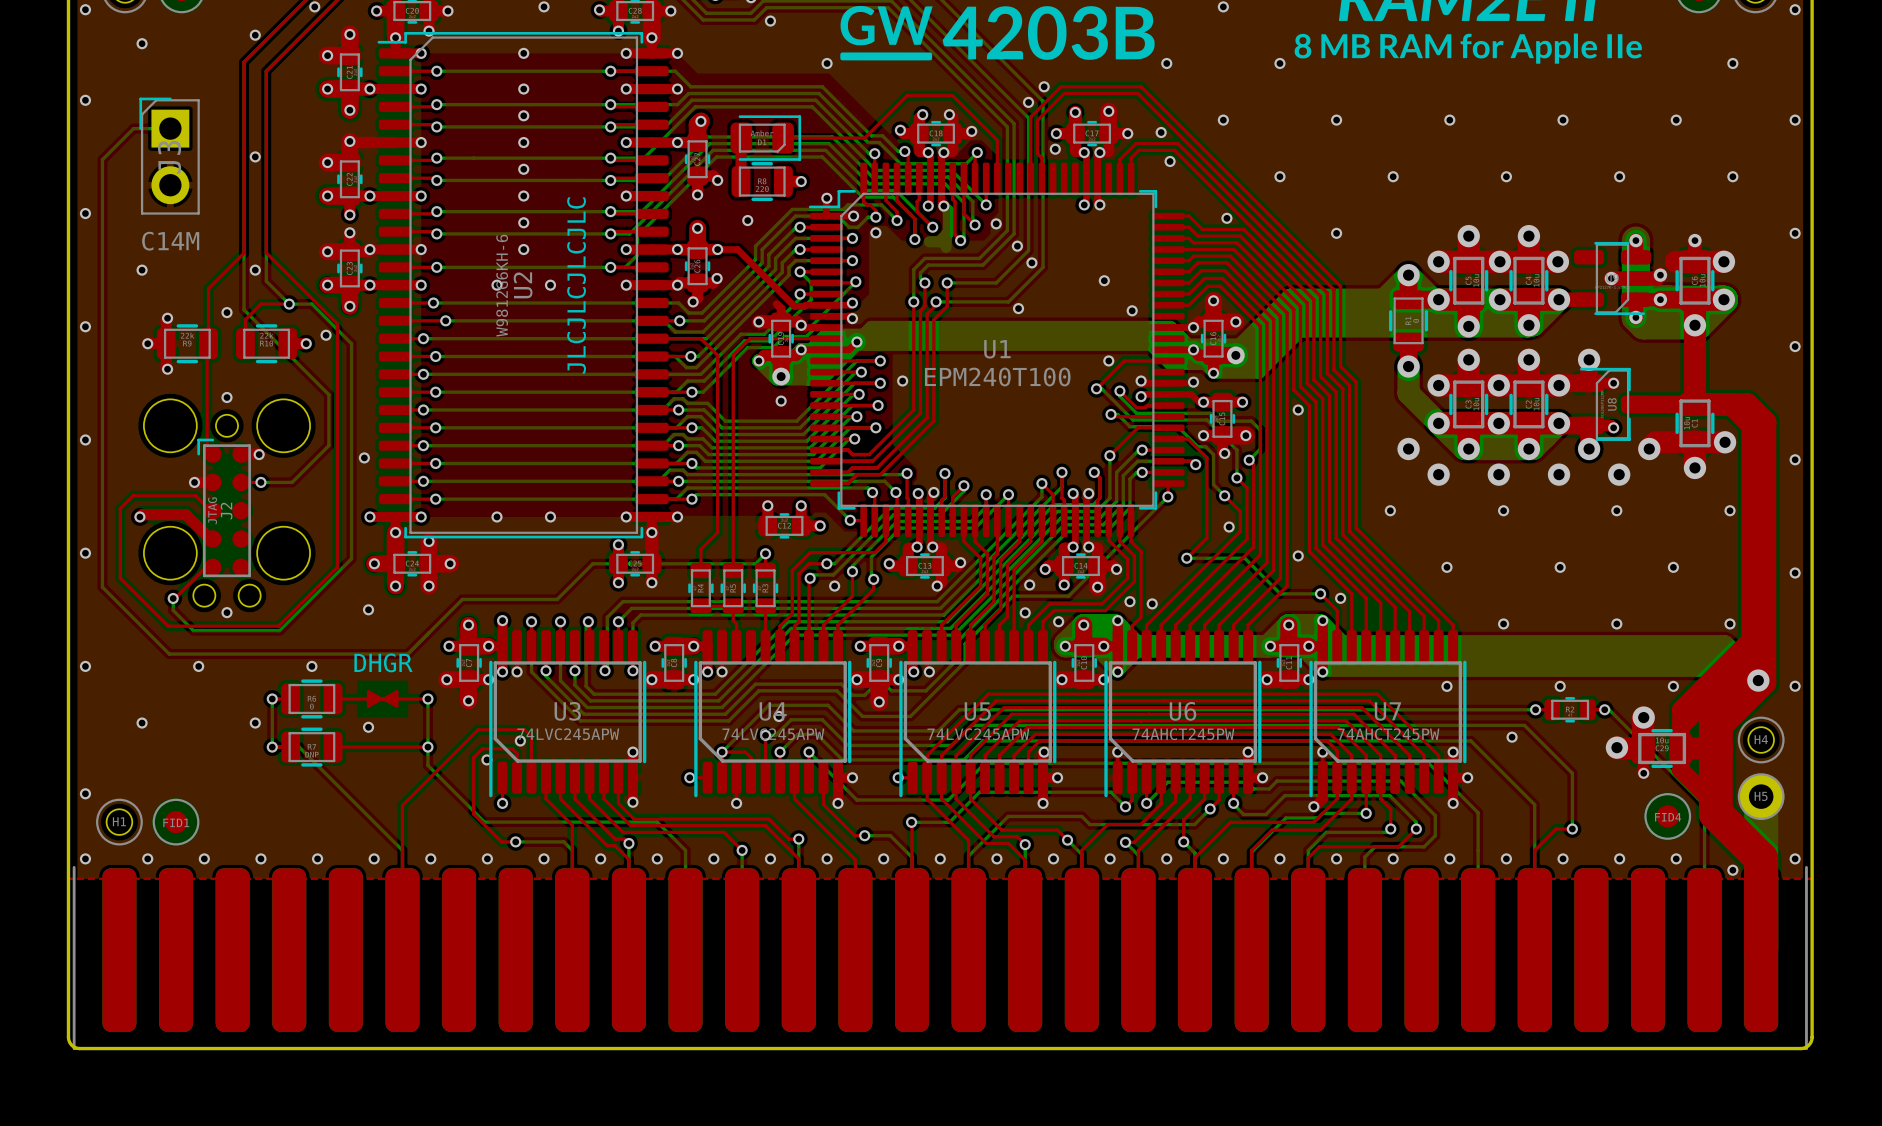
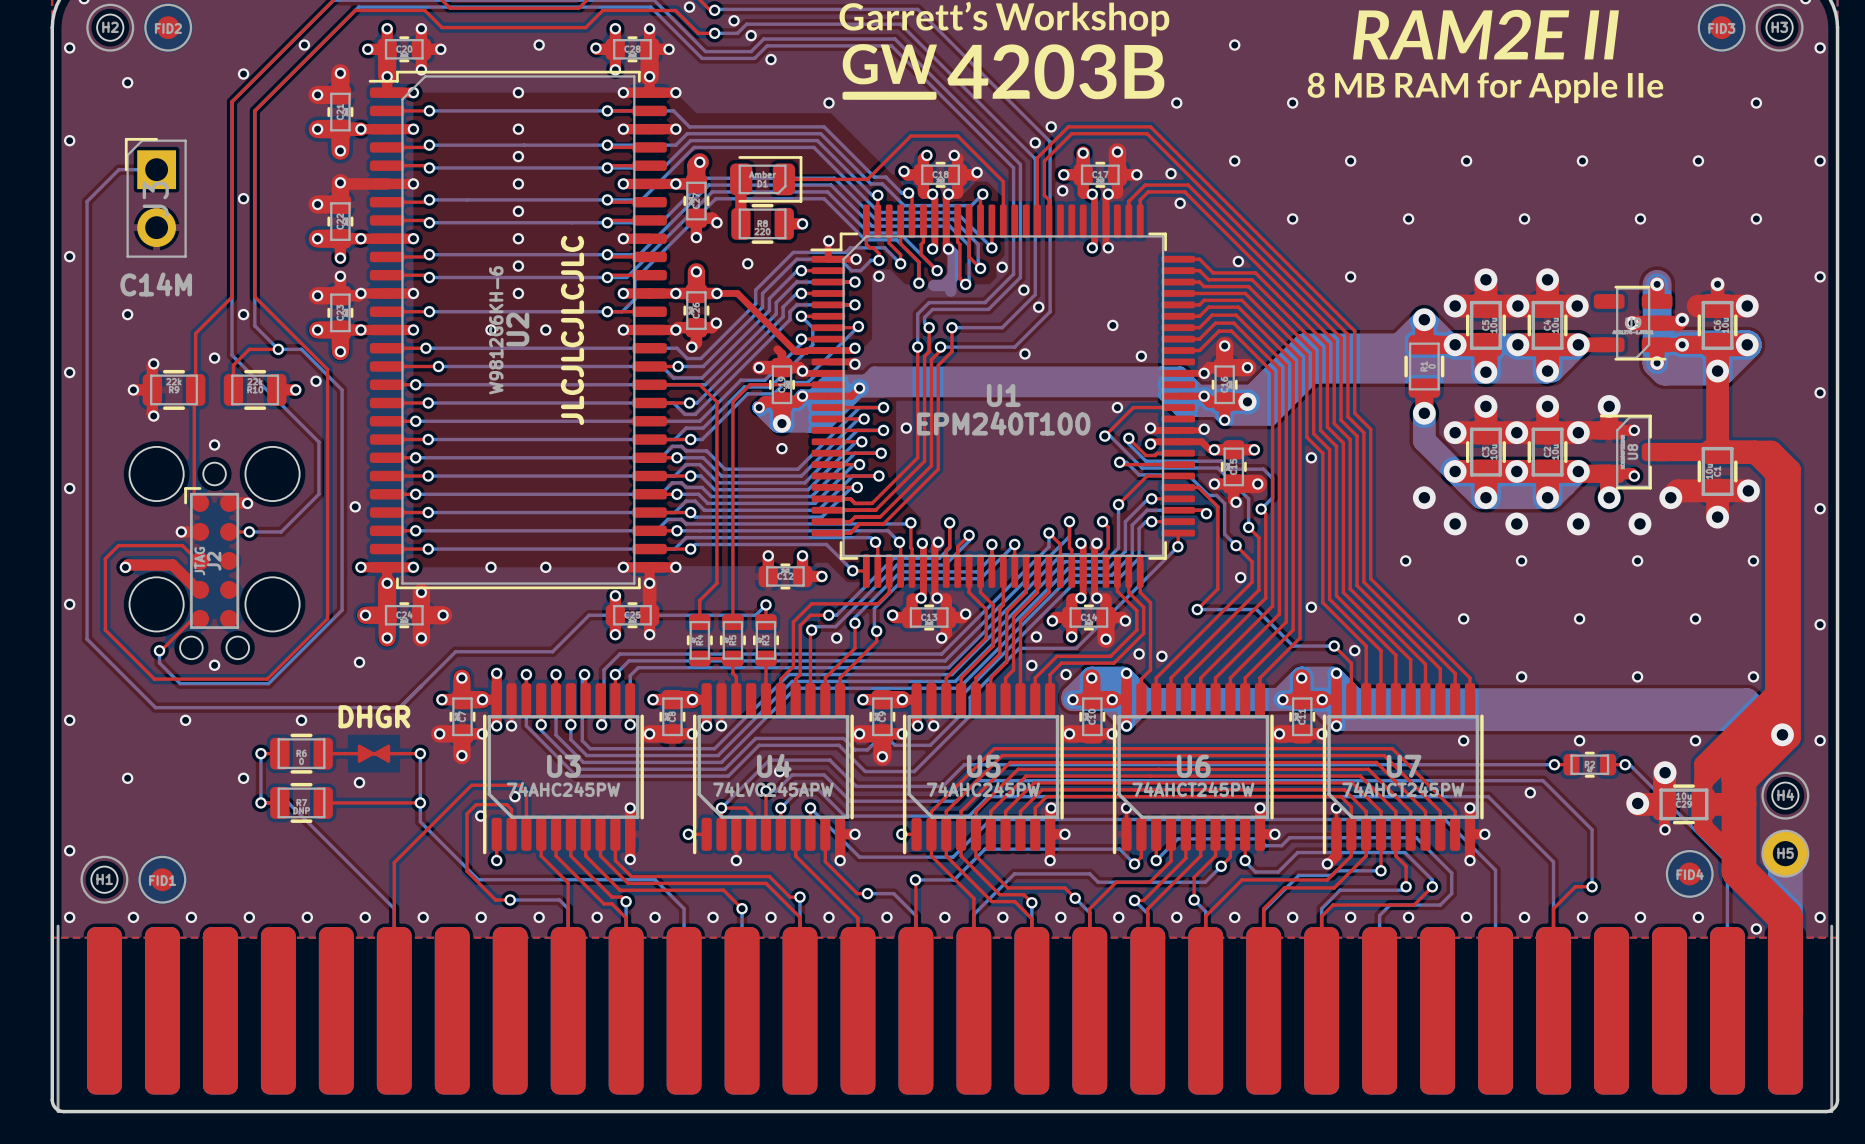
U3 value: 74LVC245APW (568, 734) -> 74AHC245PW (563, 789)
U5 value: 74LVC245APW (978, 734) -> 74AHC245PW (983, 789)

